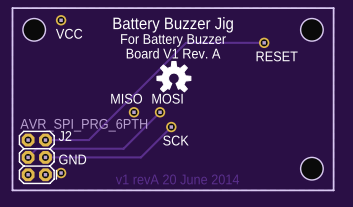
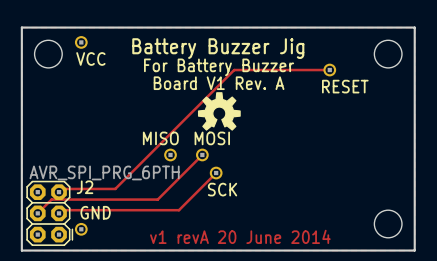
J2 footprint: [18, 130, 58, 185] -> [26, 180, 73, 246]

